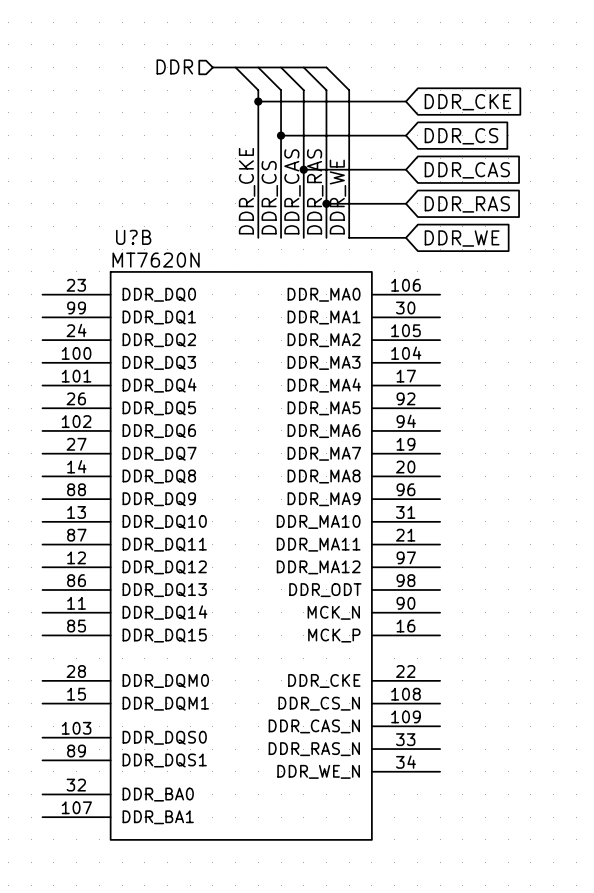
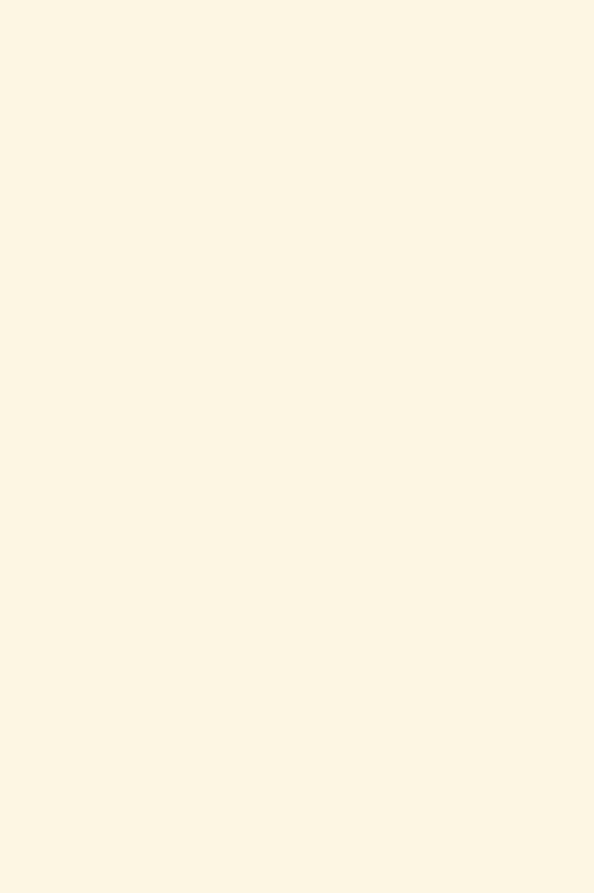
hierarchical label: DDR (174, 66) -> none
bus: (212, 67) (326, 67) -> none
wire: (235, 67) (258, 90) (258, 237) -> none
wire: (258, 67) (281, 90) (281, 237) -> none
wire: (281, 67) (303, 90) (303, 237) -> none
wire: (303, 67) (326, 90) (326, 237) -> none
wire: (326, 67) (349, 90) (349, 237) (405, 237) -> none
wire: (258, 101) (405, 101) -> none
junction: (258, 101) -> none
global label: DDR_CKE (467, 102) -> none
wire: (281, 135) (405, 135) -> none
junction: (281, 135) -> none
global label: DDR_CS (461, 136) -> none
wire: (303, 169) (405, 169) -> none
junction: (303, 169) -> none
global label: DDR_CAS (467, 170) -> none
label: DDR_CKE (247, 191) -> none
label: DDR_CAS (292, 191) -> none
label: DDR_RAS (315, 191) -> none
label: DDR_CS (269, 197) -> none
label: DDR_WE (337, 197) -> none
wire: (326, 203) (405, 203) -> none
junction: (326, 203) -> none
global label: DDR_RAS (467, 204) -> none
global label: DDR_WE (462, 238) -> none
U?B: MT7620N (241, 555) -> none

